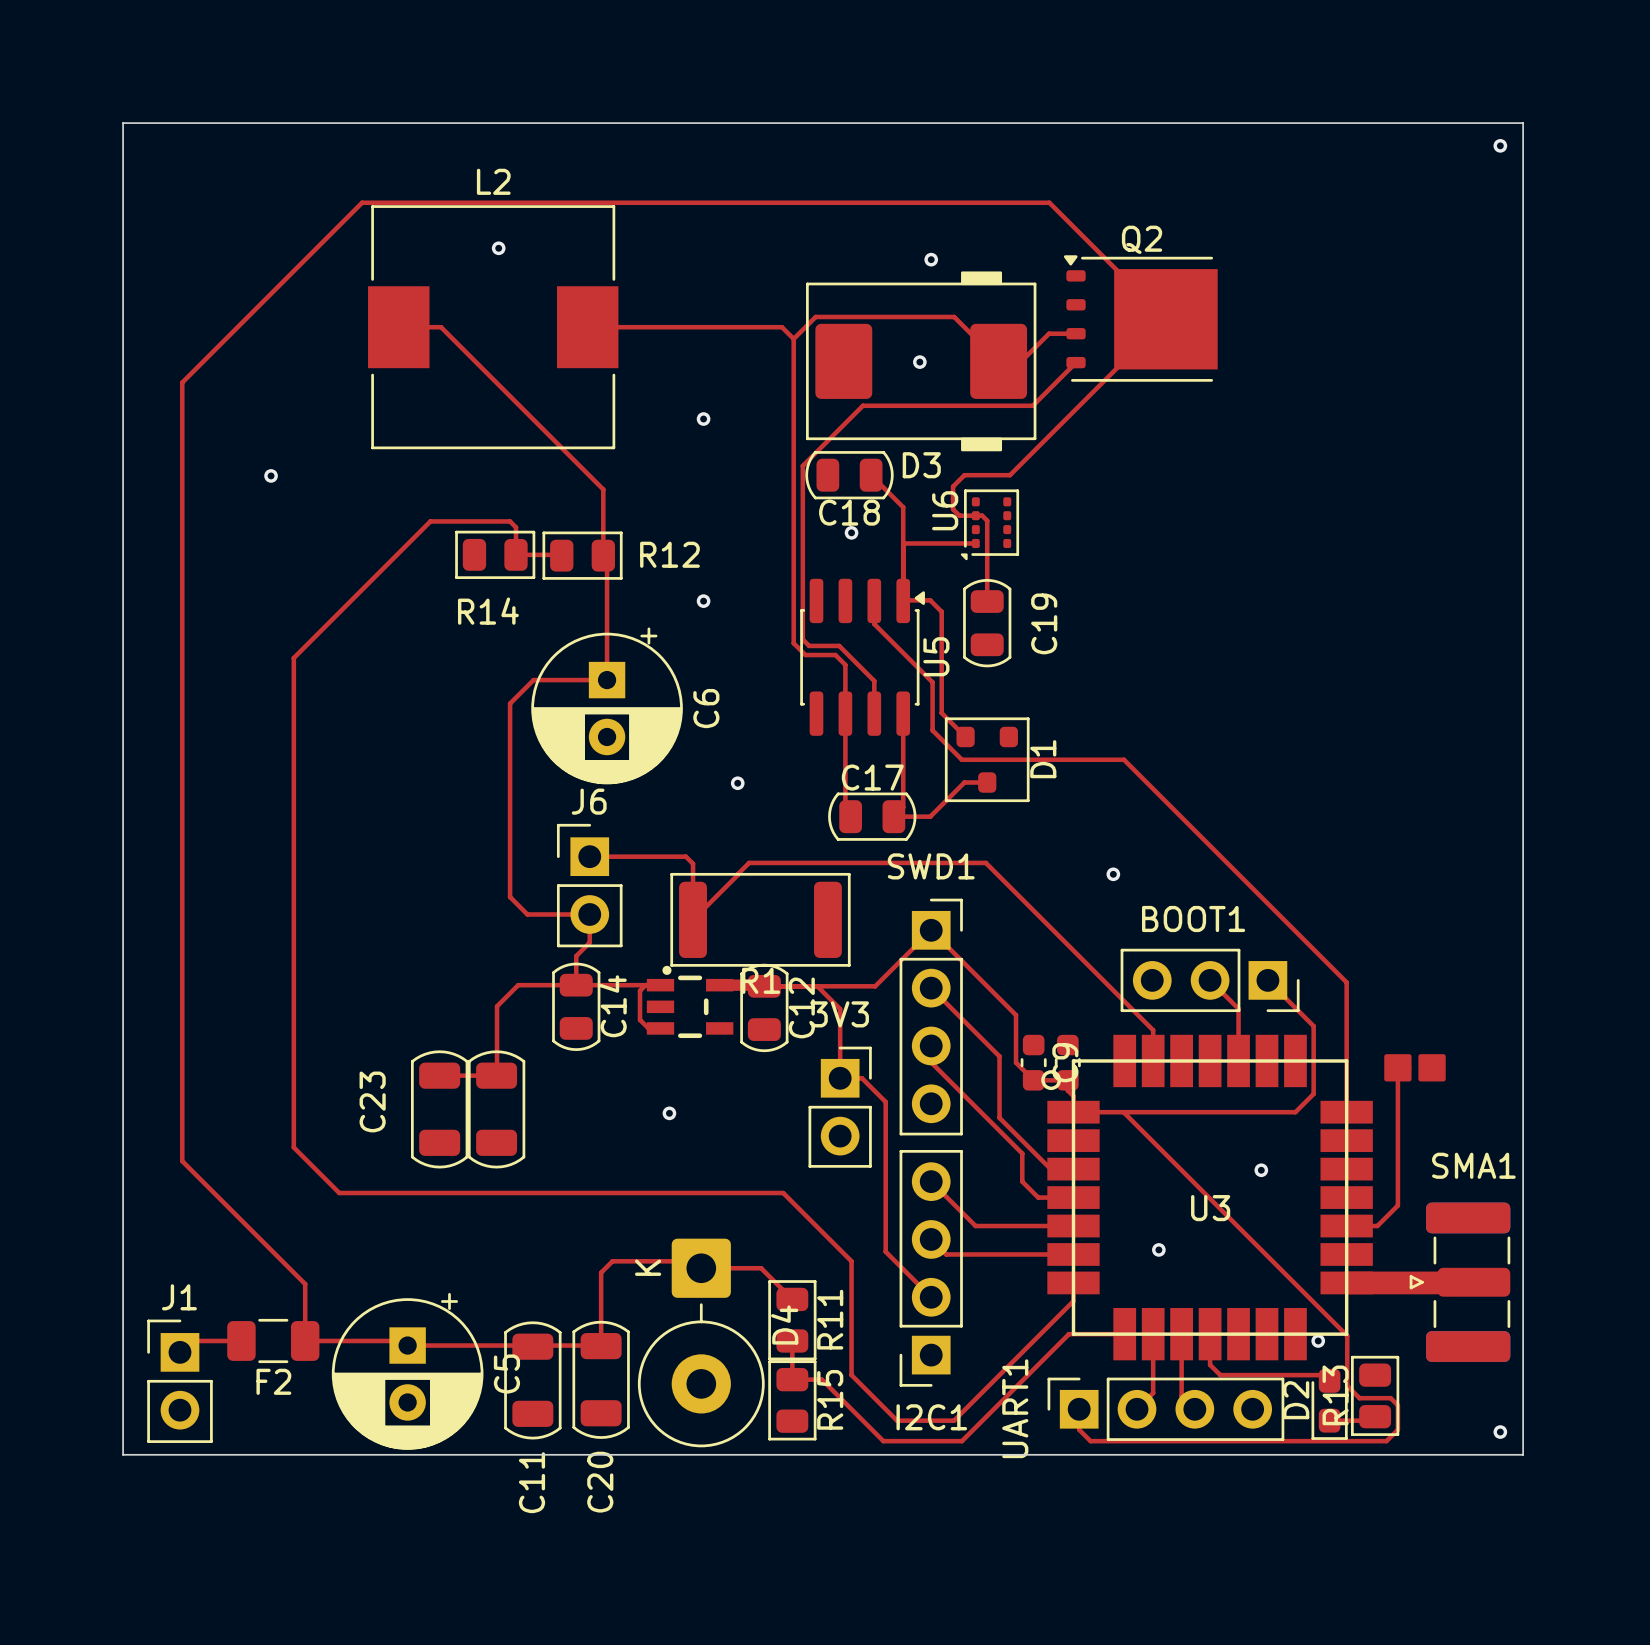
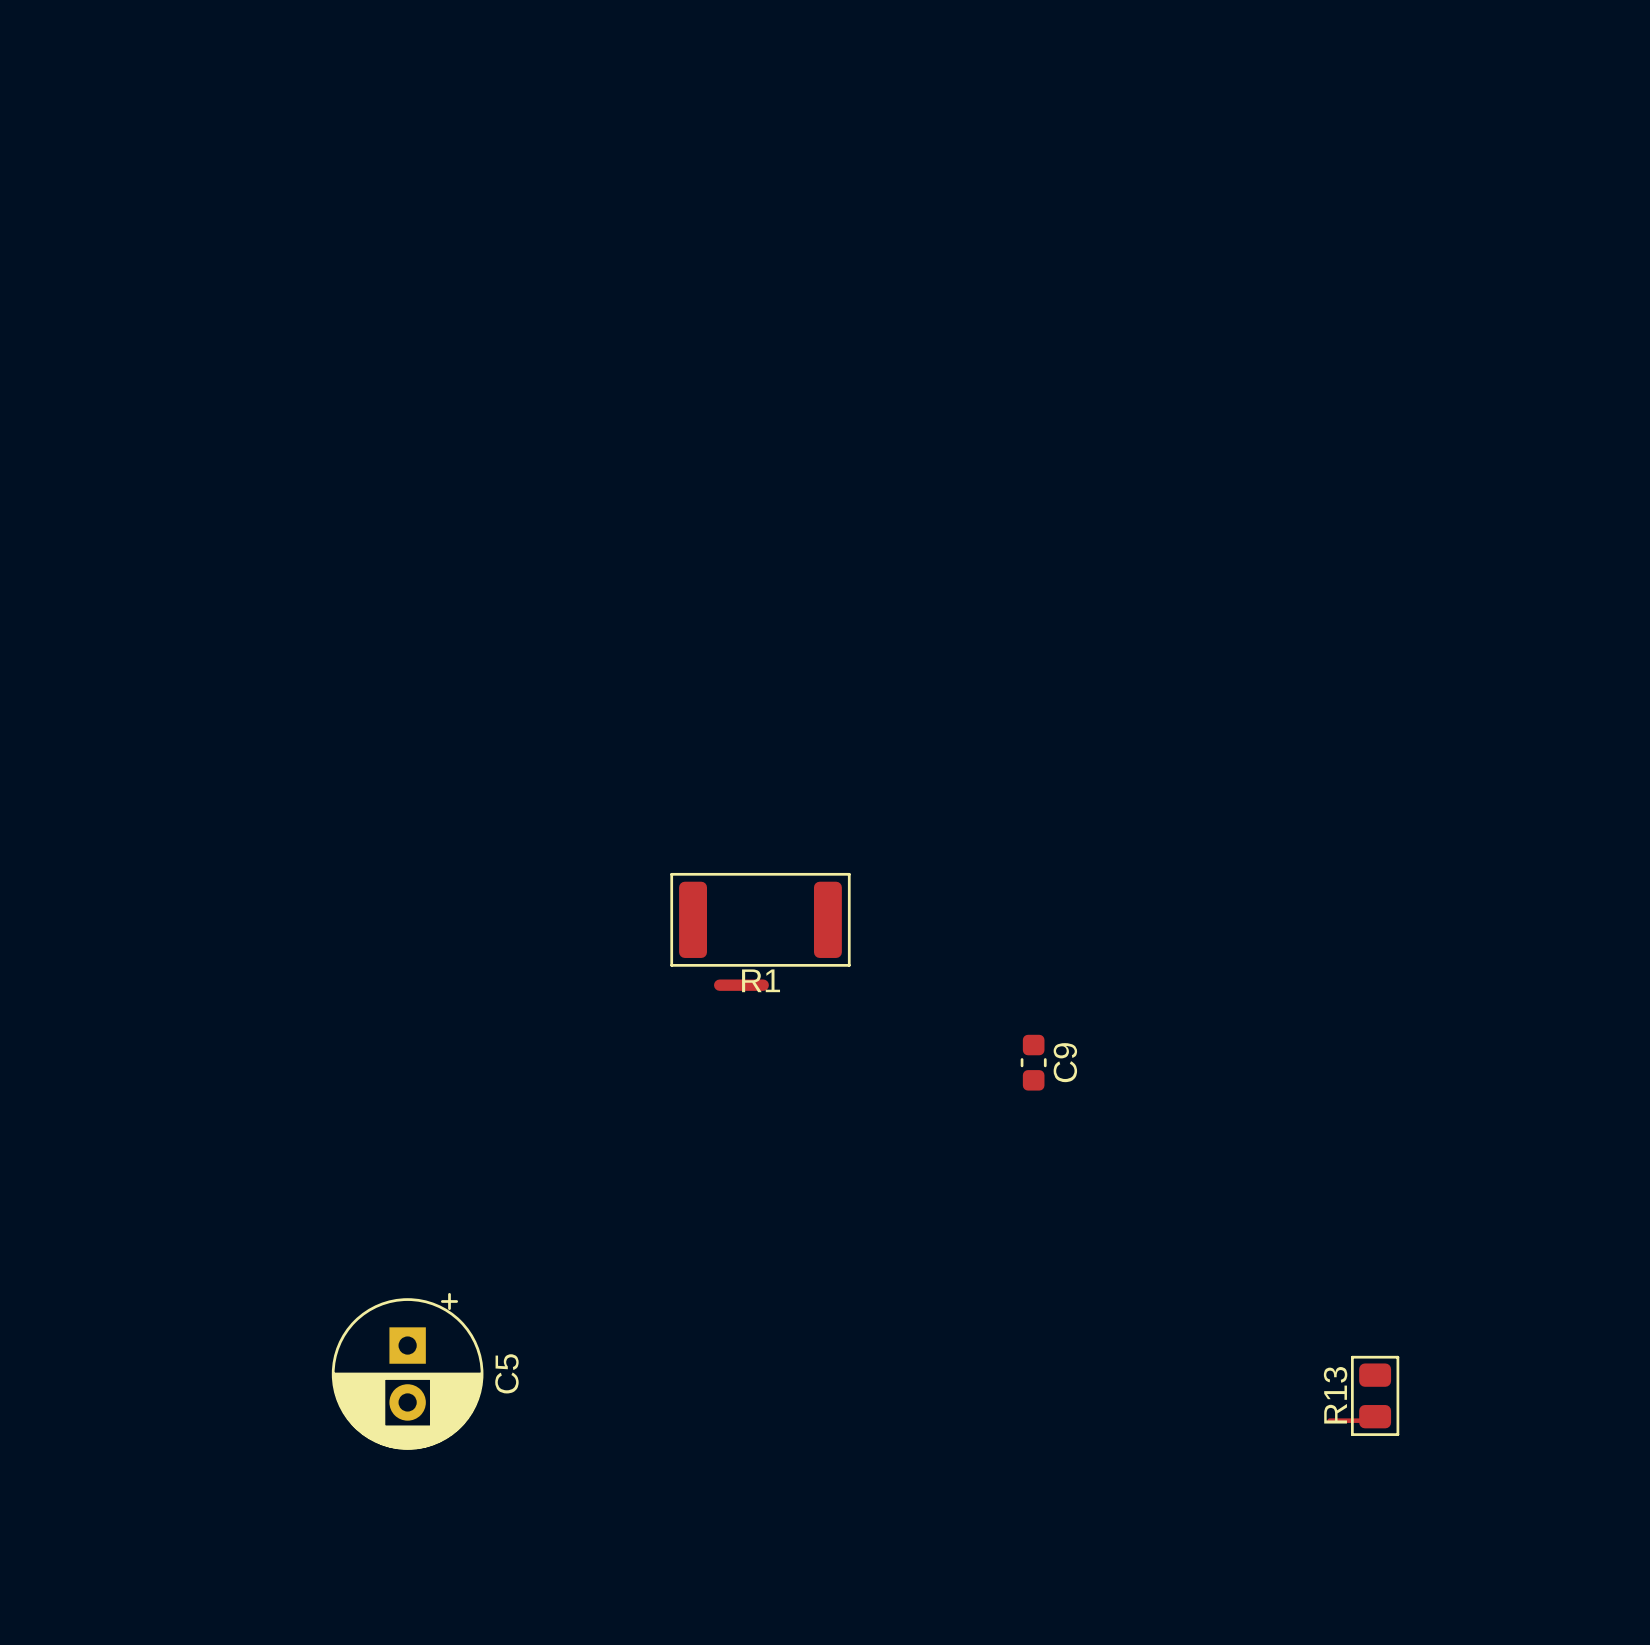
board edge: (123, 123) (1523, 123) (1523, 1454) (123, 1454) (123, 123) -> none
via: (1500, 145) -> none
via: (498, 248) -> none
via: (931, 259) -> none
Q2: (1140, 318) -> none
top track: (398, 327) (441, 327) (603, 489) (603, 555) (607, 559) (607, 680) (533, 680) (510, 703) (510, 897) (527, 914) (589, 914) (589, 942) (576, 956) (576, 985) -> none
L2: (493, 327) -> none
top track: (587, 327) (781, 327) (793, 338) -> none
top track: (1076, 333) (1049, 333) (1021, 361) (998, 361) (954, 316) (815, 316) (793, 338) -> none
top track: (793, 338) (793, 643) (805, 655) (835, 655) (845, 664) (845, 811) (850, 816) -> none
D3: (921, 361) -> none
via: (919, 362) -> none
top track: (1076, 362) (1032, 405) (862, 405) (802, 465) (802, 639) (809, 645) (839, 645) (874, 680) (874, 713) -> none
via: (703, 419) -> none
via: (271, 475) -> none
C18: (849, 475) -> none
top track: (871, 475) (903, 507) (903, 600) (930, 600) (941, 611) (941, 713) (965, 736) -> none
U6: (989, 524) -> none
via: (851, 532) -> none
top track: (903, 543) (975, 543) -> none
R14: (495, 554) -> none
top track: (561, 555) (515, 554) (515, 527) (510, 521) (430, 521) (293, 658) (293, 1147) (339, 1193) (783, 1193) (851, 1261) (851, 1375) (897, 1420) (953, 1420) (1073, 1301) (1073, 1282) -> none
R12: (582, 555) -> none
top track: (874, 600) (874, 624) (932, 682) (932, 730) (961, 759) (1123, 759) (1346, 982) (1346, 1112) -> none
via: (703, 601) -> none
top track: (987, 601) (987, 520) (982, 515) (959, 515) (953, 509) (953, 486) (964, 475) (1009, 475) (1165, 319) (1049, 202) (362, 202) (182, 382) (182, 1161) (305, 1284) (305, 1340) (403, 1340) -> none
C19: (987, 623) -> none
U5: (862, 657) -> none
C6: (607, 705) -> none
top track: (903, 713) (903, 807) (893, 816) (930, 816) (964, 782) (987, 782) -> none
D1: (987, 759) -> none
via: (737, 783) -> none
C17: (872, 816) -> none
top track: (589, 856) (685, 856) (693, 863) (693, 919) (749, 862) (985, 862) (1153, 1030) (1153, 1060) -> none
via: (1113, 874) -> none
J6: (589, 885) -> none
top track: (1210, 980) (1238, 1008) (1238, 1060) -> none
BOOT1: (1210, 980) -> none
top track: (1267, 980) (1313, 1026) (1313, 1093) (1295, 1112) (1073, 1112) (1073, 1096) (1067, 1090) (1067, 1080) (1033, 1080) (1016, 1062) (1016, 1015) (931, 930) (875, 986) (764, 986) (765, 985) -> none
top track: (645, 985) (640, 990) (640, 1019) (648, 1028) (660, 1028) -> none
top track: (659, 986) (660, 985) (518, 985) (497, 1006) (496, 1075) (439, 1075) -> none
top track: (817, 986) (840, 1009) (840, 1078) (862, 1078) (885, 1101) (885, 1251) (931, 1297) -> none
top track: (931, 988) (999, 1056) (999, 1117) (1050, 1169) (1073, 1169) -> none
part: (690, 1001) -> none
C14: (576, 1006) -> none
C12: (764, 1007) -> none
SWD1: (931, 1017) -> none
top track: (931, 1045) (931, 1062) (1022, 1153) (1022, 1181) (1038, 1197) (1073, 1197) -> none
drawing: [1384, 1054, 1446, 1082] -> none
part: (1067, 1062) -> none
top track: (1409, 1067) (1397, 1079) (1397, 1205) (1377, 1226) (1346, 1226) -> none
3V3: (840, 1107) -> none
C23: (439, 1109) -> none
part: (496, 1109) -> none
top track: (1124, 1112) (1347, 1335) (1347, 1385) (1359, 1398) (1390, 1398) (1397, 1405) (1397, 1429) (1386, 1441) (1090, 1441) (1079, 1429) (1079, 1409) -> none
via: (669, 1113) -> none
via: (1261, 1170) -> none
top track: (931, 1181) (975, 1226) (1073, 1226) -> none
U3: (1207, 1197) -> none
top track: (931, 1239) (946, 1254) (1073, 1254) -> none
via: (1158, 1249) -> none
I2C1: (931, 1268) -> none
top track: (1437, 1282) (1346, 1282) -> none
SMA1: (1459, 1282) -> none
top track: (792, 1299) (761, 1268) (701, 1268) (694, 1261) (612, 1261) (601, 1272) (601, 1346) -> none
R11: (792, 1320) -> none
top track: (1124, 1334) (1068, 1334) (961, 1441) (883, 1441) (821, 1379) (792, 1379) (792, 1340) -> none
top track: (1153, 1334) (1153, 1393) (1137, 1409) -> none
top track: (1181, 1334) (1181, 1396) (1194, 1409) -> none
top track: (1210, 1334) (1210, 1364) (1220, 1375) (1323, 1375) (1329, 1380) -> none
top track: (191, 1340) (241, 1340) -> none
F2: (273, 1340) -> none
via: (1318, 1340) -> none
D4: (701, 1342) -> none
top track: (407, 1345) (600, 1345) -> none
C20: (601, 1379) -> none
C11: (532, 1380) -> none
J1: (179, 1381) -> none
R15: (792, 1400) -> none
D2: (1329, 1404) -> none
UART1: (1165, 1409) -> none
via: (1500, 1432) -> none

